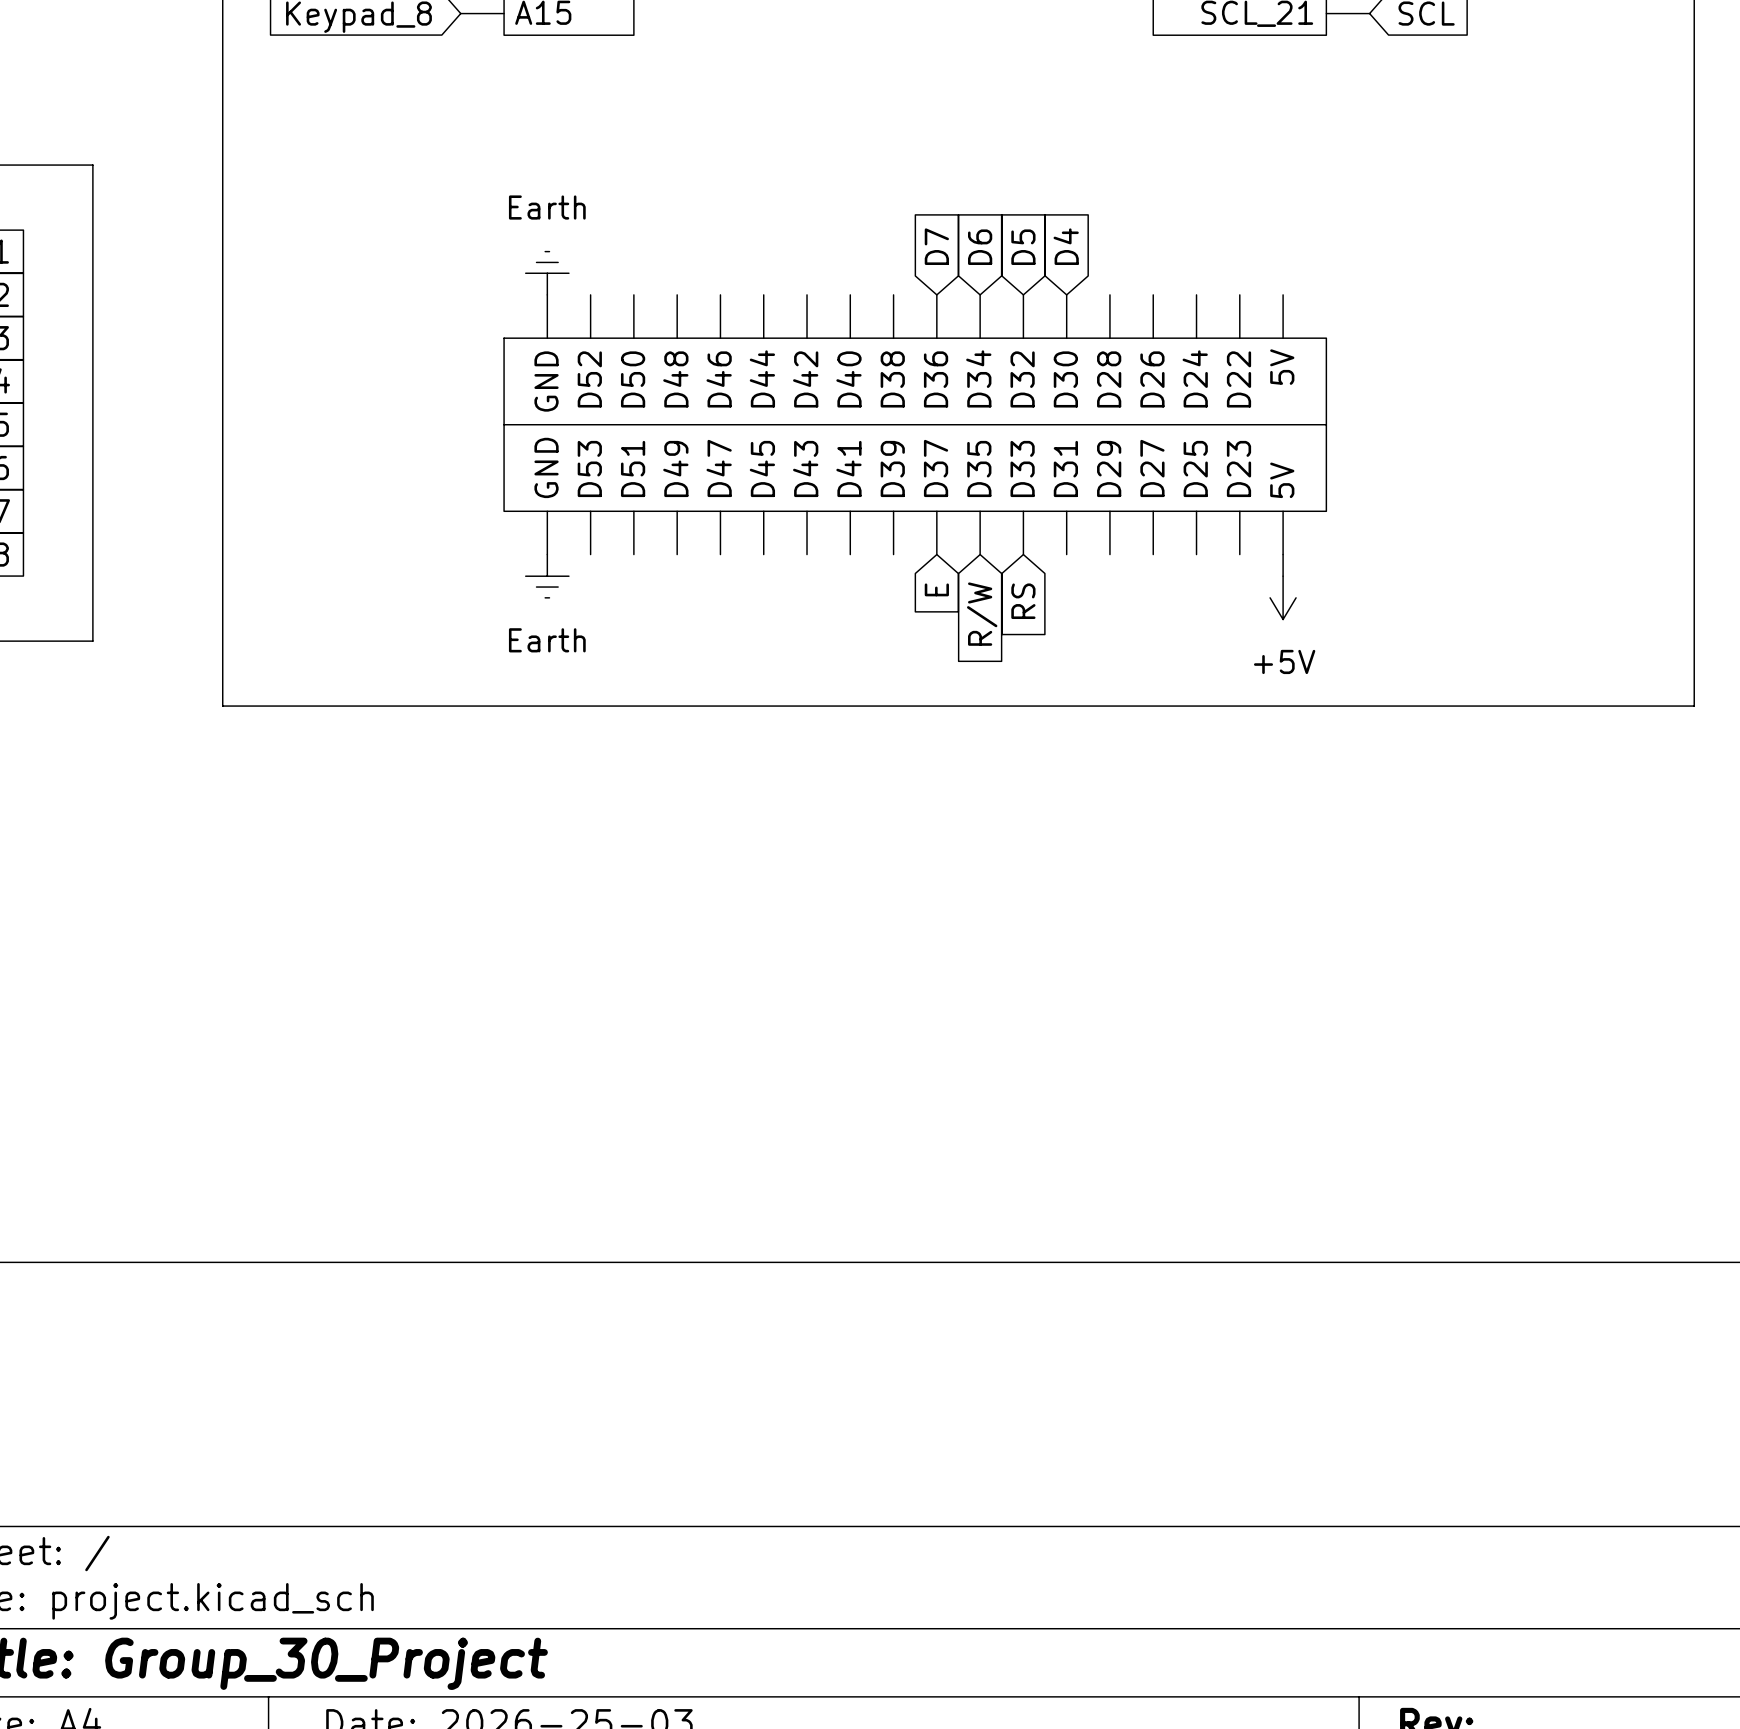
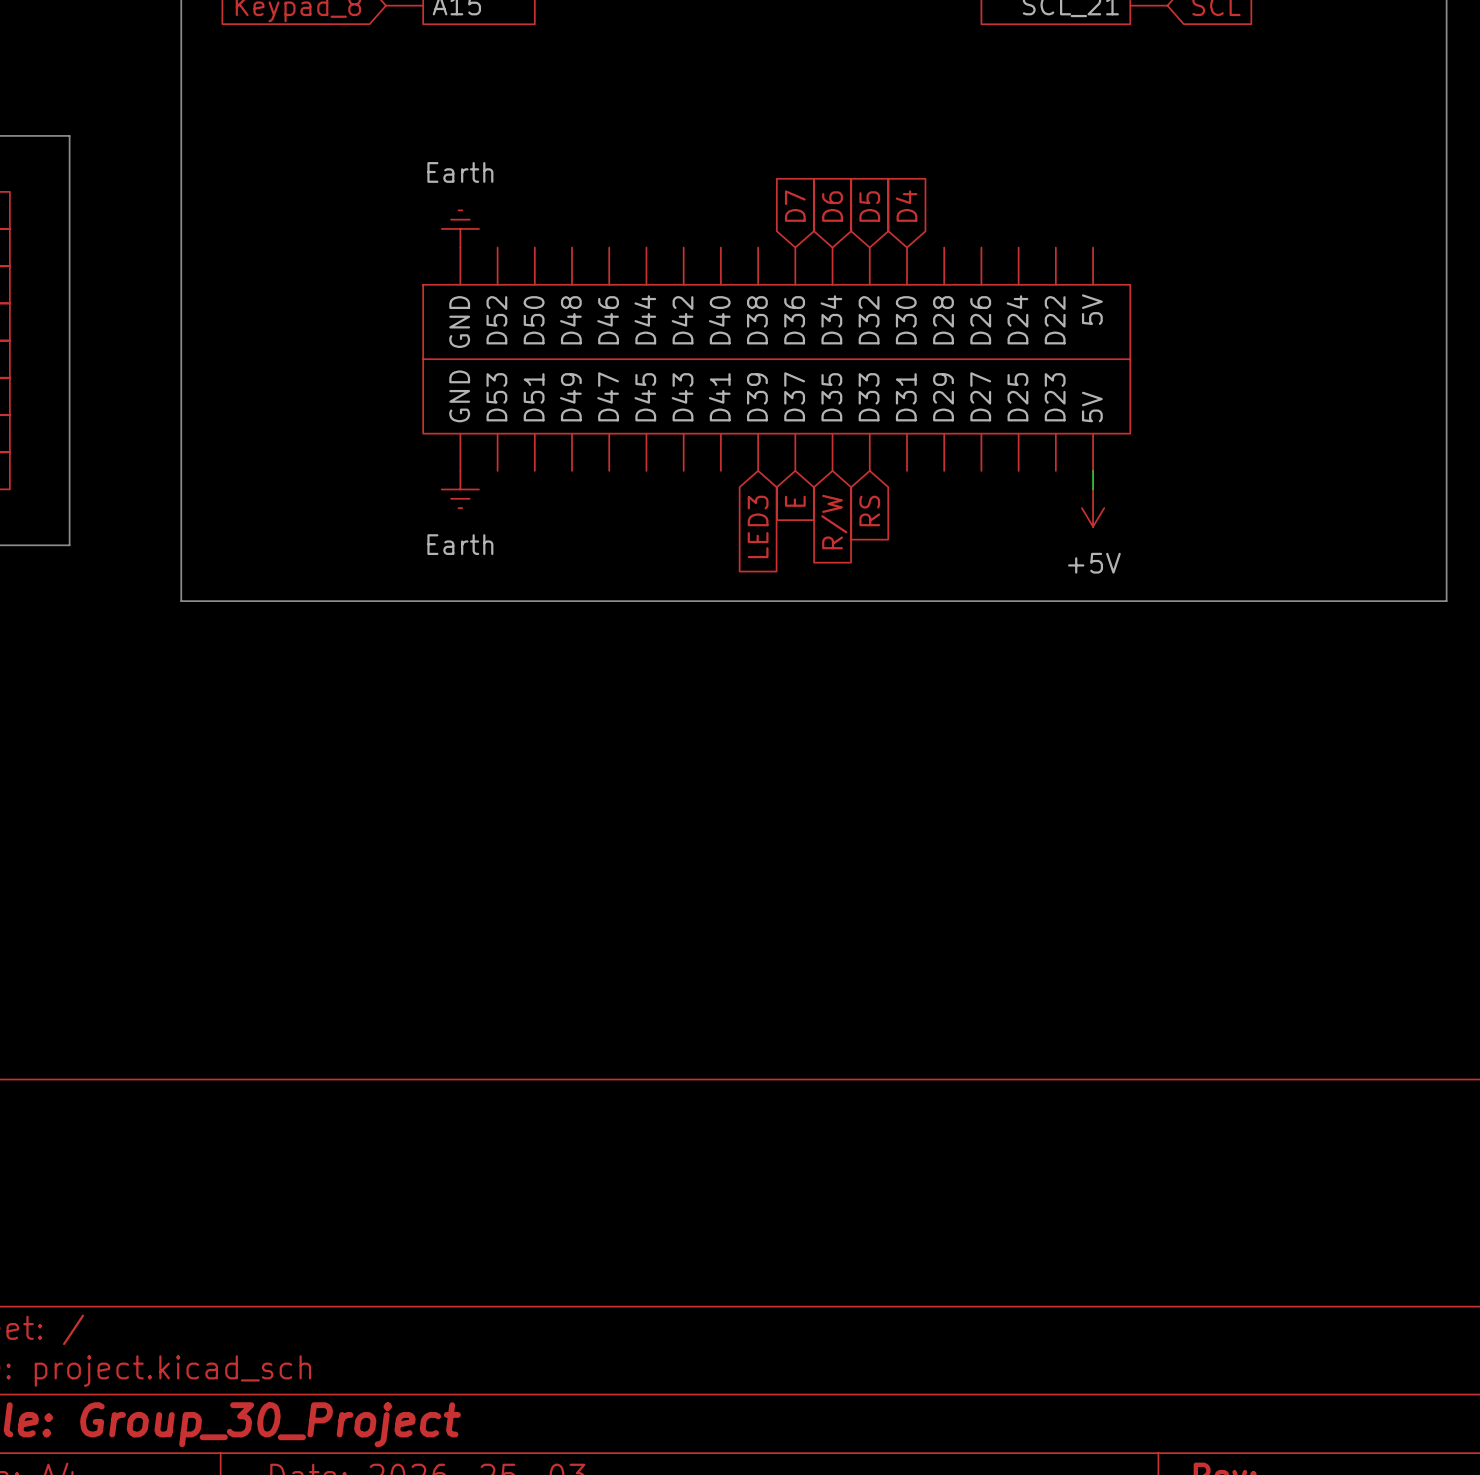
global label: none -> LED3 (758, 526)

